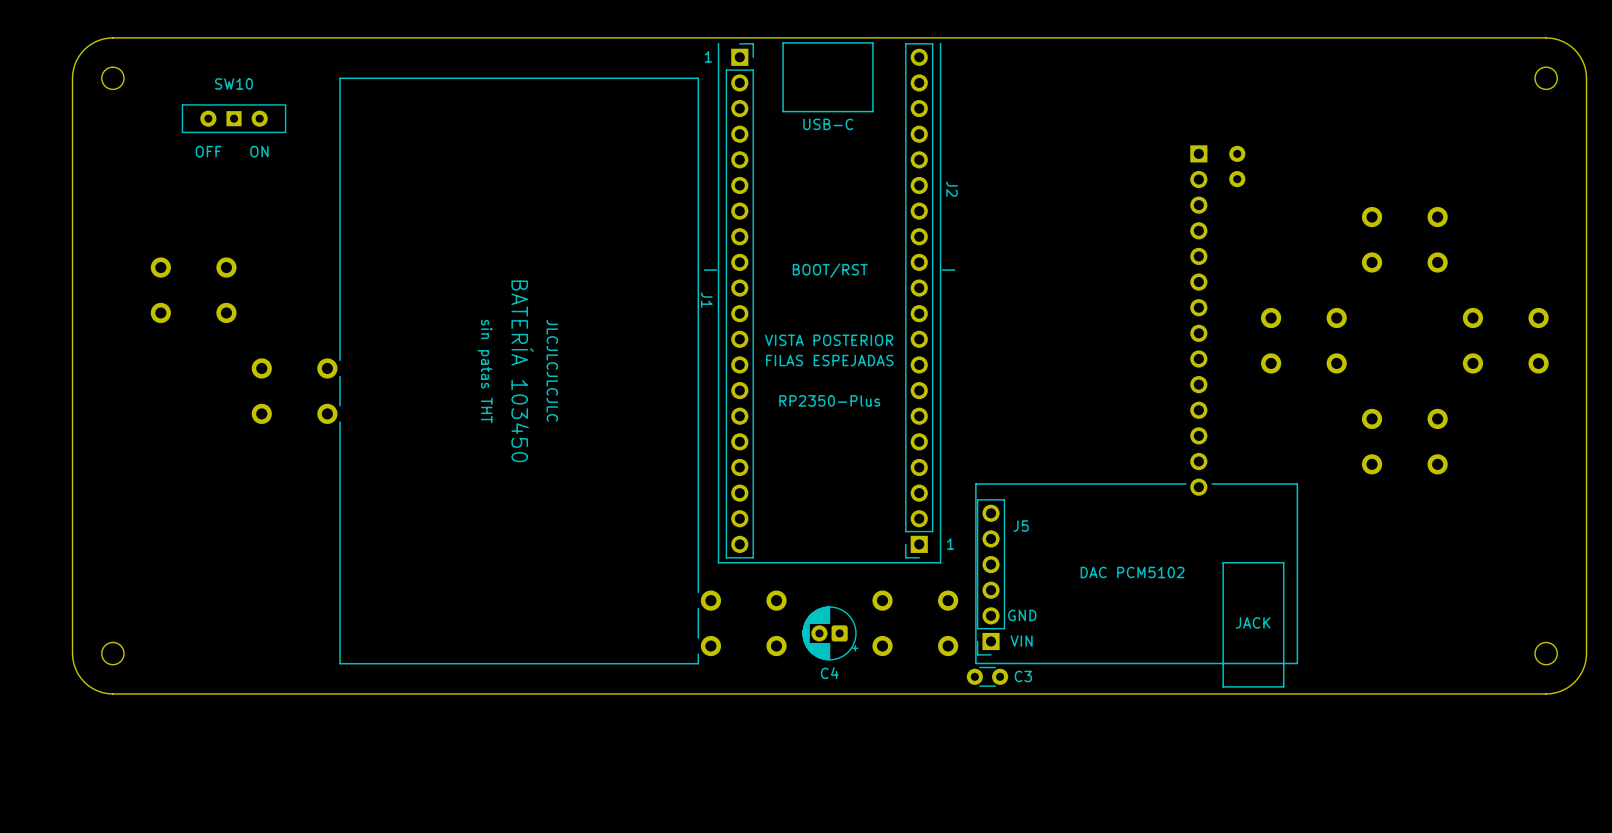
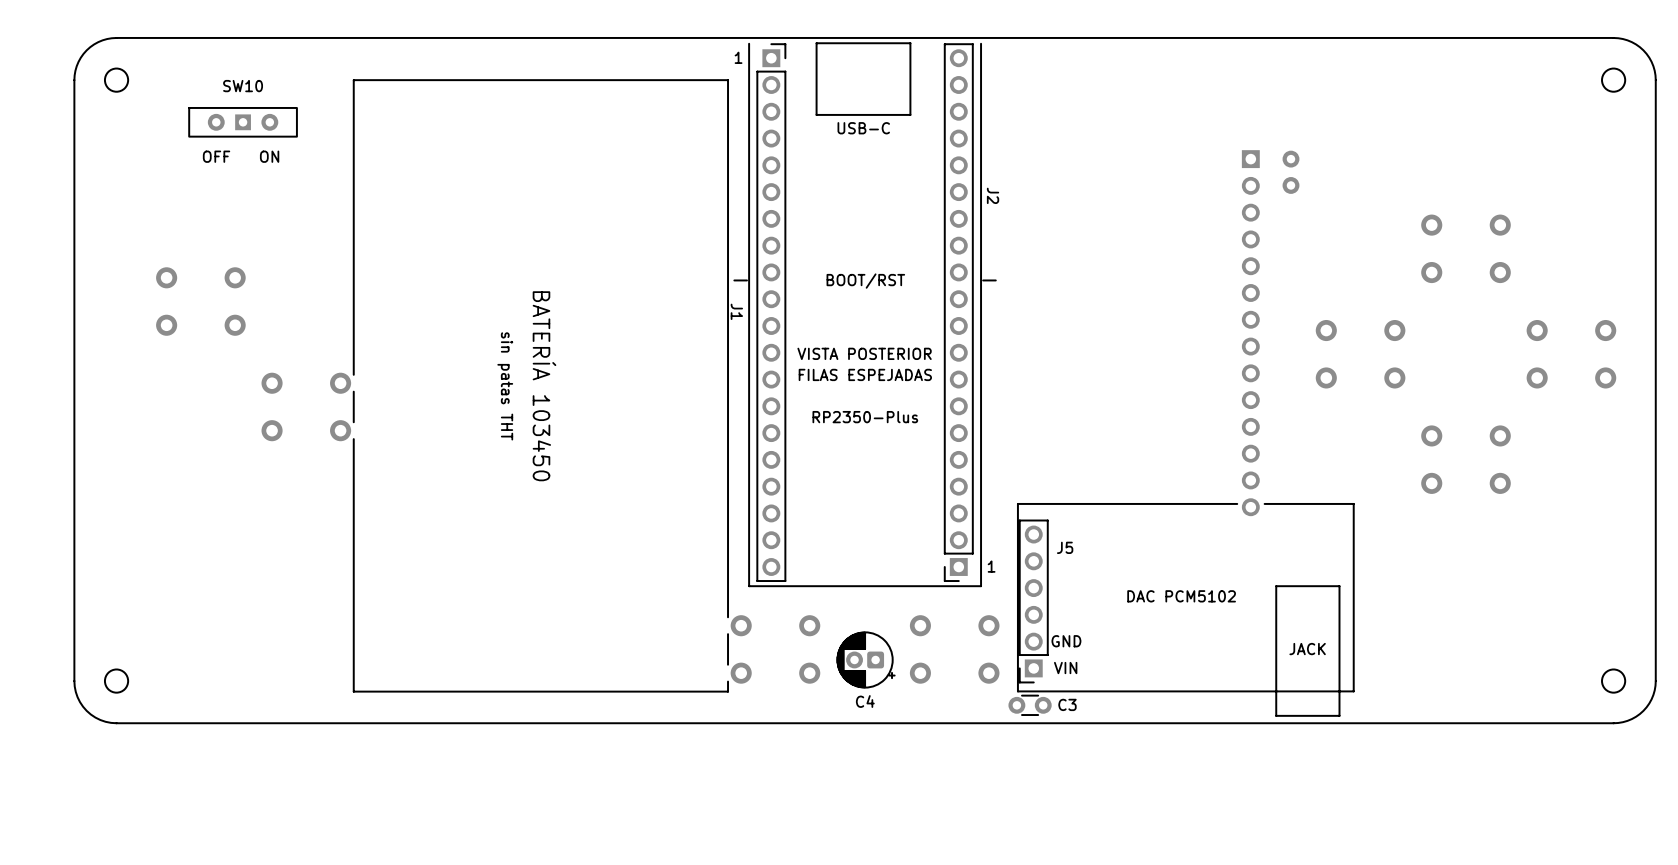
text: JLCJLCJLCJLC (552, 370) -> none

